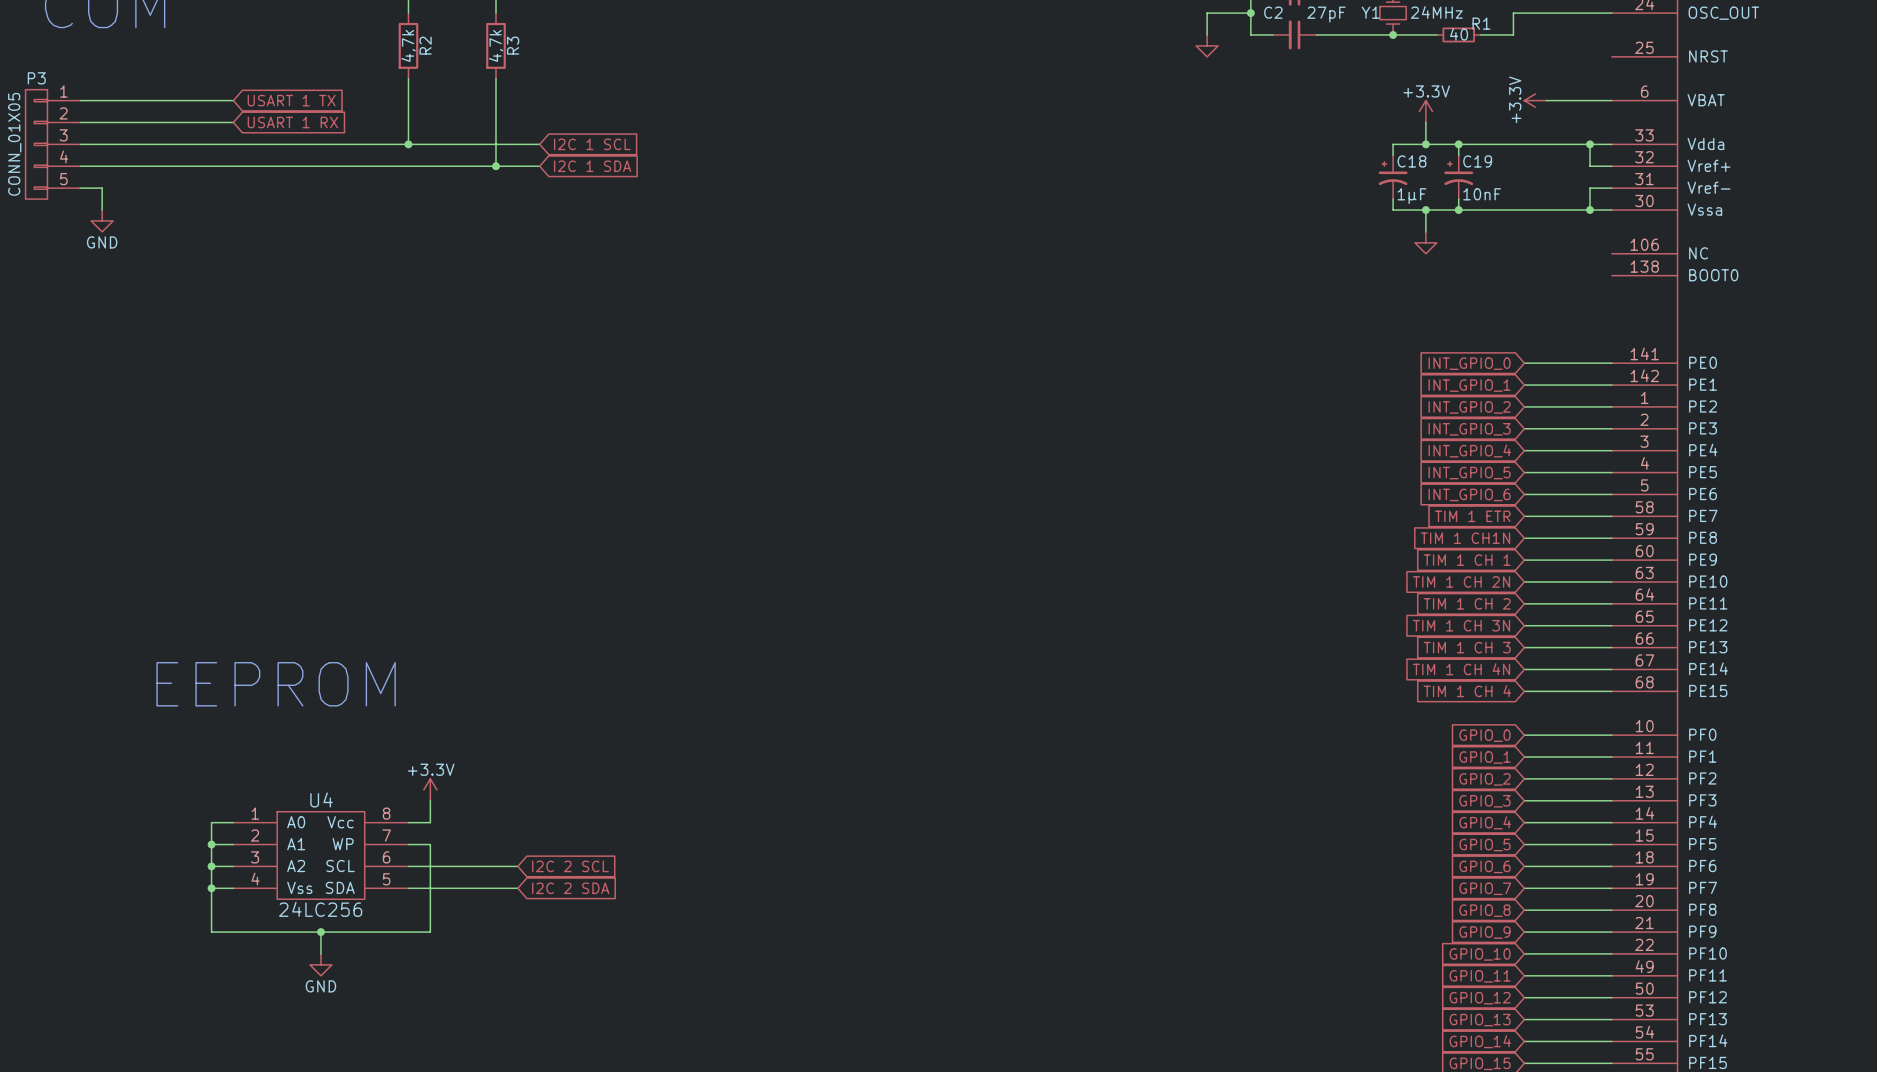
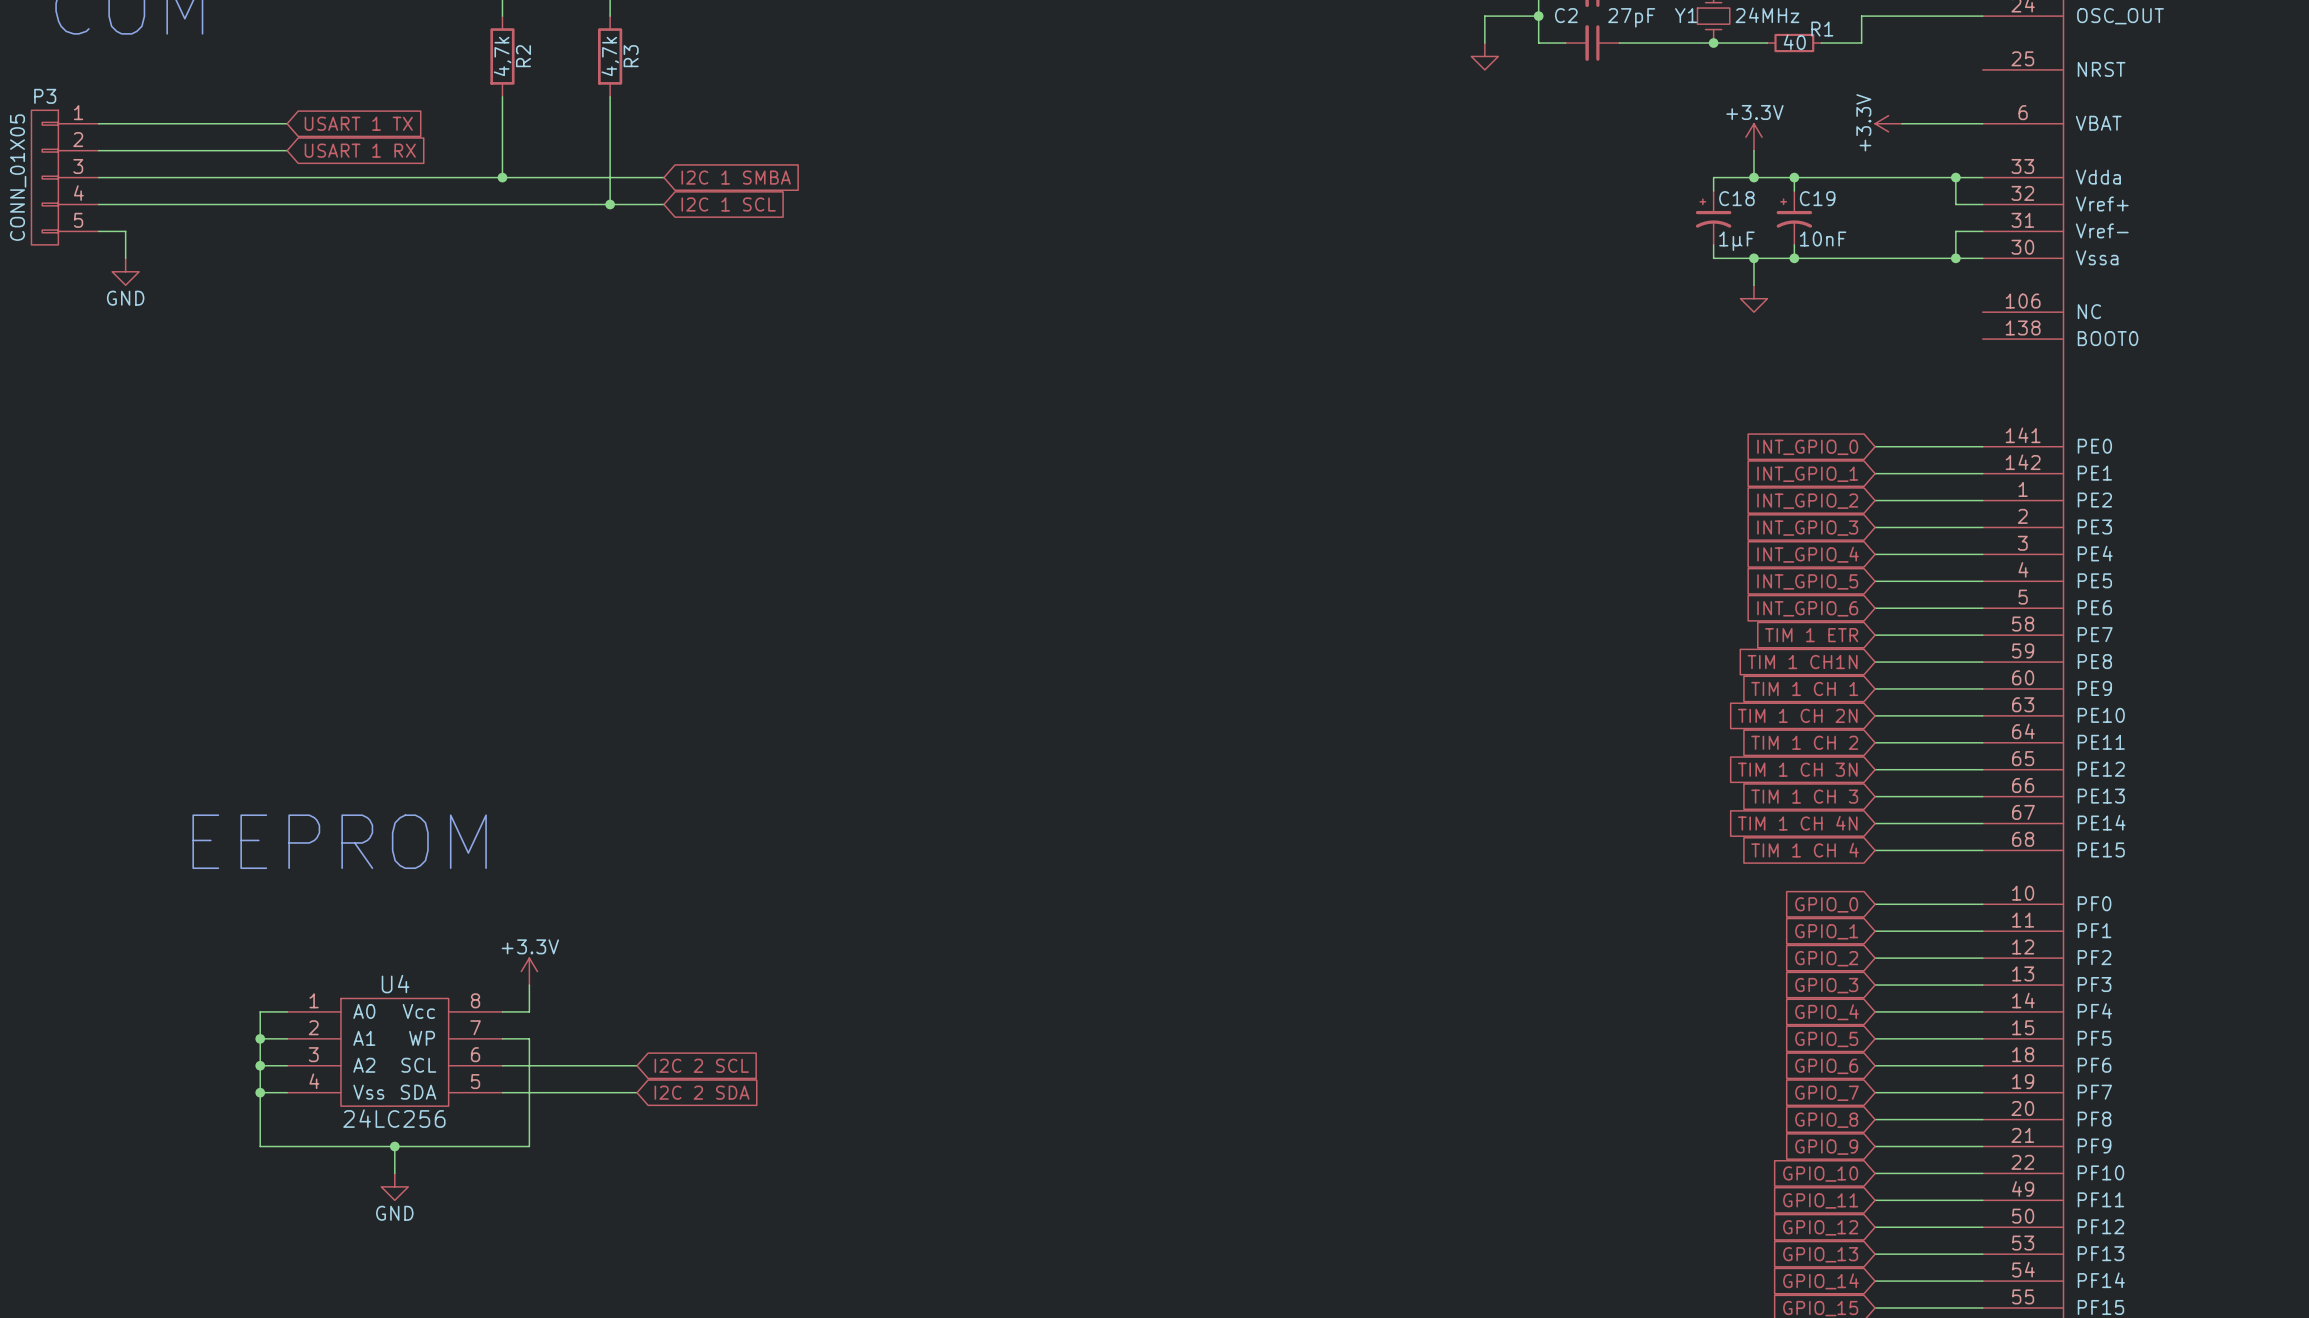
global label: I2C 1 SCL (592, 144) -> I2C 1 SMBA (736, 177)
global label: I2C 1 SDA (592, 166) -> I2C 1 SCL (728, 204)

